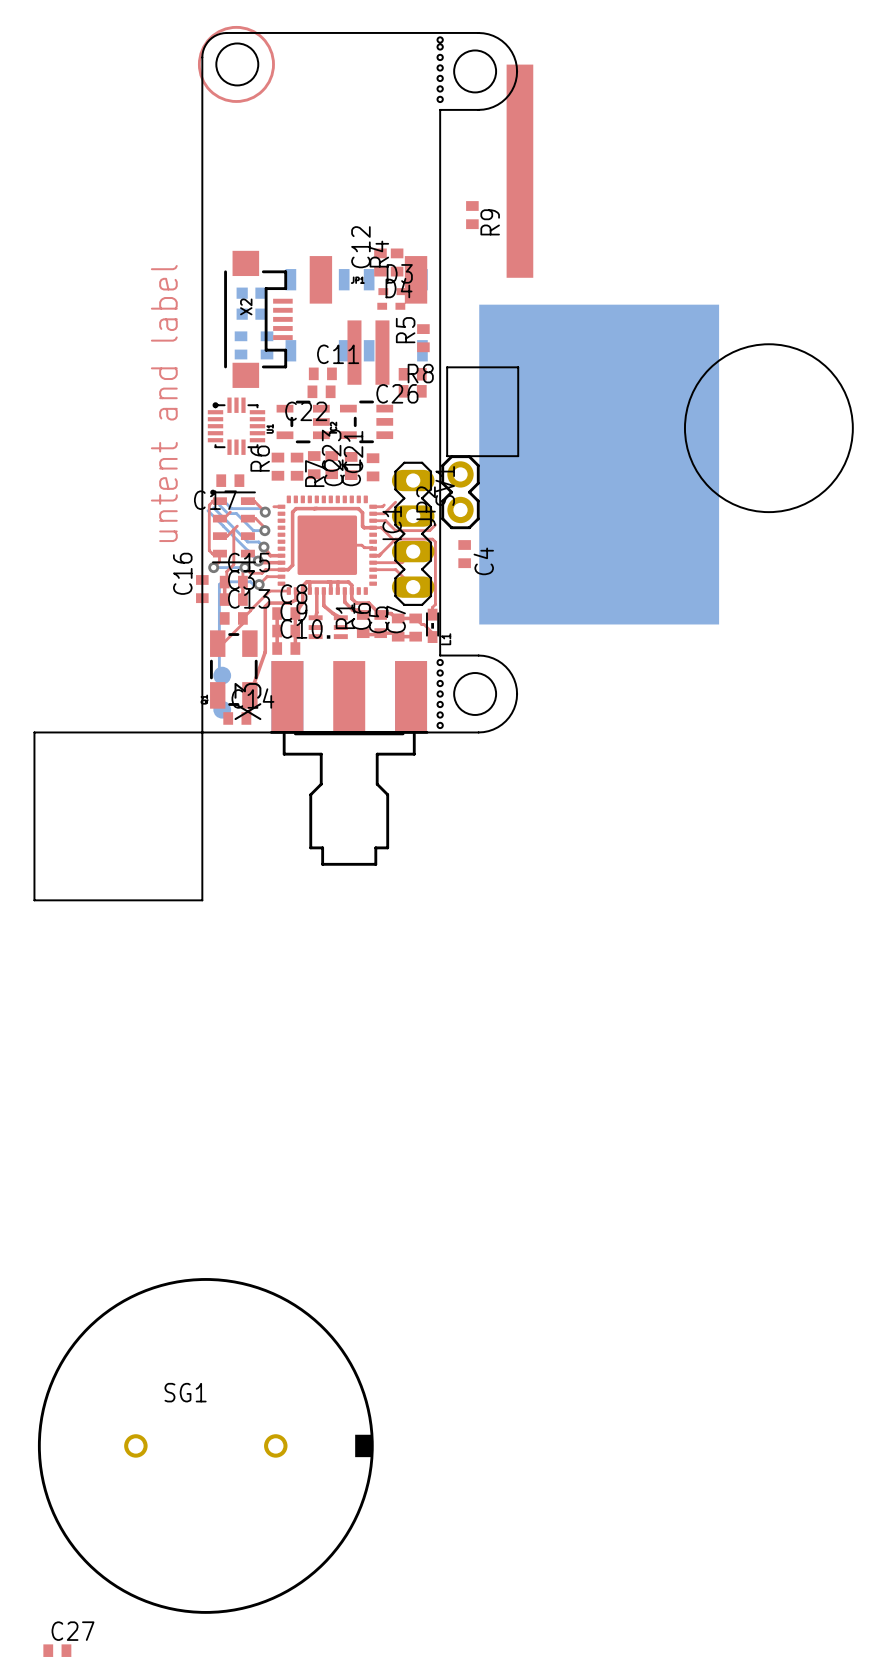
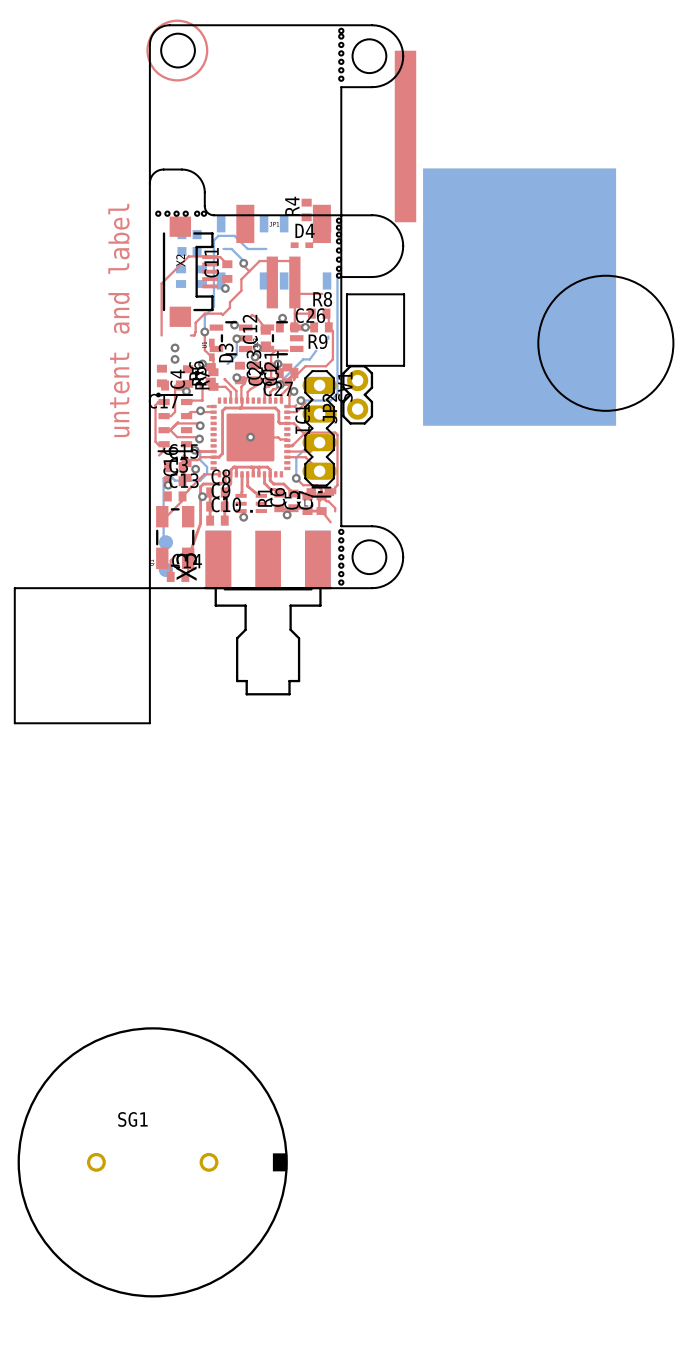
R9 rotation: 0° (472, 215) -> 90° clockwise (321, 327)
R9 position: (472, 215) -> (321, 327)
board edge: none -> (149, 183) (152, 174) (160, 169) (184, 169) (193, 172) (200, 178) (204, 186) (205, 209) (212, 215) (372, 215)
C12 position: (380, 262) -> (265, 338)
hole: none -> (158, 213)
hole: none -> (167, 213)
hole: none -> (176, 213)
hole: none -> (185, 213)
hole: none -> (197, 213)
hole: none -> (204, 213)
board edge: none -> (372, 215) (387, 219) (399, 230) (403, 246) (399, 261) (391, 270) (380, 275) (341, 277)
hole: none -> (339, 220)
hole: none -> (339, 227)
D3 rotation: 0° (392, 291) -> 90° clockwise (211, 349)
D3 position: (392, 291) -> (211, 349)
hole: none -> (339, 234)
hole: none -> (339, 241)
bottom track: none -> (223, 248) (231, 248) (243, 263)
bottom track: none -> (266, 248) (247, 248) (234, 235) (218, 235) (213, 240) (213, 306) (204, 315) (204, 336)
hole: none -> (339, 250)
X2 position: (258, 319) -> (190, 271)
hole: none -> (339, 259)
top track: none -> (243, 263) (249, 271)
via: none -> (243, 263)
top track: none -> (227, 264) (220, 257) (188, 256) (161, 283) (161, 335)
hole: none -> (339, 268)
R5 position: (423, 338) -> (213, 379)
bottom track: none -> (337, 274) (337, 393) (330, 400) (300, 400) (303, 398)
hole: none -> (339, 275)
C11 name position: C11 (338, 354) -> C11 (211, 262)
via: none -> (225, 288)
top track: none -> (294, 293) (322, 293)
C11 rotation: 0° (322, 373) -> 90° clockwise (227, 271)
C11 position: (322, 373) -> (227, 271)
C26 position: (412, 374) -> (287, 327)
C22: (321, 391) -> none
top track: none -> (294, 313) (314, 313)
top track: none -> (328, 313) (328, 327) (332, 331) (332, 359) (326, 366) (305, 366) (294, 379) (294, 373) (289, 378) (289, 386) (281, 394) (281, 398)
top track: none -> (251, 315) (256, 317) (265, 330)
via: none -> (282, 318)
via: none -> (234, 325)
top track: none -> (294, 327) (294, 266) (289, 261) (259, 261) (241, 279) (241, 290) (229, 302) (229, 307) (222, 314) (204, 313) (195, 322) (194, 335) (190, 335)
via: none -> (305, 327)
top track: none -> (204, 331) (204, 350) (213, 358) (213, 372)
via: none -> (204, 331)
bottom track: none -> (328, 336) (328, 338)
bottom track: none -> (236, 338) (236, 354) (227, 363)
via: none -> (236, 338)
part: (236, 426) -> none
via: none -> (175, 347)
via: none -> (257, 347)
top track: none -> (287, 350) (275, 350) (271, 354) (271, 384) (264, 388) (264, 398)
bottom track: none -> (316, 350) (309, 359) (303, 359) (280, 382) (280, 384)
via: none -> (255, 357)
via: none -> (175, 359)
via: none -> (202, 363)
via: none -> (278, 363)
drawing position: (599, 464) -> (519, 297)
R7 position: (297, 466) -> (188, 376)
top track: none -> (236, 377) (236, 379) (239, 377) (246, 378) (241, 386) (242, 407)
via: none -> (236, 377)
top track: none -> (260, 378) (259, 383) (247, 392) (247, 398)
top track: none -> (225, 379) (236, 390) (236, 398)
top track: none -> (280, 384) (270, 392) (270, 398)
via: none -> (280, 384)
top track: none -> (200, 386) (202, 384) (202, 400) (186, 402)
top track: none -> (213, 386) (225, 386) (230, 392) (230, 398)
via: none -> (186, 391)
top track: none -> (294, 391) (289, 396) (289, 406)
via: none -> (294, 391)
via: none -> (300, 400)
top track: (254, 501) (265, 512) -> none
bottom track: (225, 502) (231, 508) (265, 508) (265, 512) -> none
bottom track: (219, 505) (227, 513) (236, 513) (253, 530) (264, 530) -> none
bottom track: (213, 507) (247, 542) (258, 542) (263, 547) -> none
top track: (230, 512) (223, 518) -> (176, 385) (175, 412) (170, 416) (167, 416)
top track: none -> (200, 412) (211, 412)
top track: (247, 518) (255, 518) (264, 527) (264, 530) -> (186, 416) (190, 412) (200, 412)
top track: (373, 520) (385, 520) (395, 530) (429, 530) (435, 524) -> none
top track: none -> (197, 423) (177, 423) (170, 430)
top track: (233, 529) (233, 564) (226, 571) (224, 599) -> none
top track: none -> (170, 430) (177, 437) (197, 437)
via: none -> (250, 437)
top track: (263, 547) (270, 555) (281, 555) -> none
bottom track: none -> (319, 442) (310, 444) (296, 457) (296, 478)
C4 position: (464, 554) -> (161, 375)
bottom track: (213, 567) (247, 567) -> none
via: (213, 567) -> none
via: (244, 567) -> none
top track: (281, 576) (267, 576) (259, 584) -> none
bottom track: (259, 584) (253, 584) (250, 581) (222, 581) (219, 584) (219, 596) -> (200, 450) (200, 460) (207, 466) (207, 473) (200, 480) (175, 480) (172, 478) (163, 478)
C16 position: (202, 589) -> (186, 470)
top track: none -> (296, 478) (303, 485) (316, 485) (321, 489) (319, 507) (330, 522)
via: none -> (296, 478)
via: none -> (168, 485)
via: none -> (202, 496)
L1 rotation: 0° (432, 625) -> 90° clockwise (320, 492)
L1 position: (432, 625) -> (320, 492)
via: none -> (287, 514)
via: none -> (243, 517)
top track: none -> (175, 556) (170, 560) (170, 576)
C27 name position: C27 (73, 1631) -> C27 (278, 388)
C27 position: (57, 1650) -> (287, 373)

